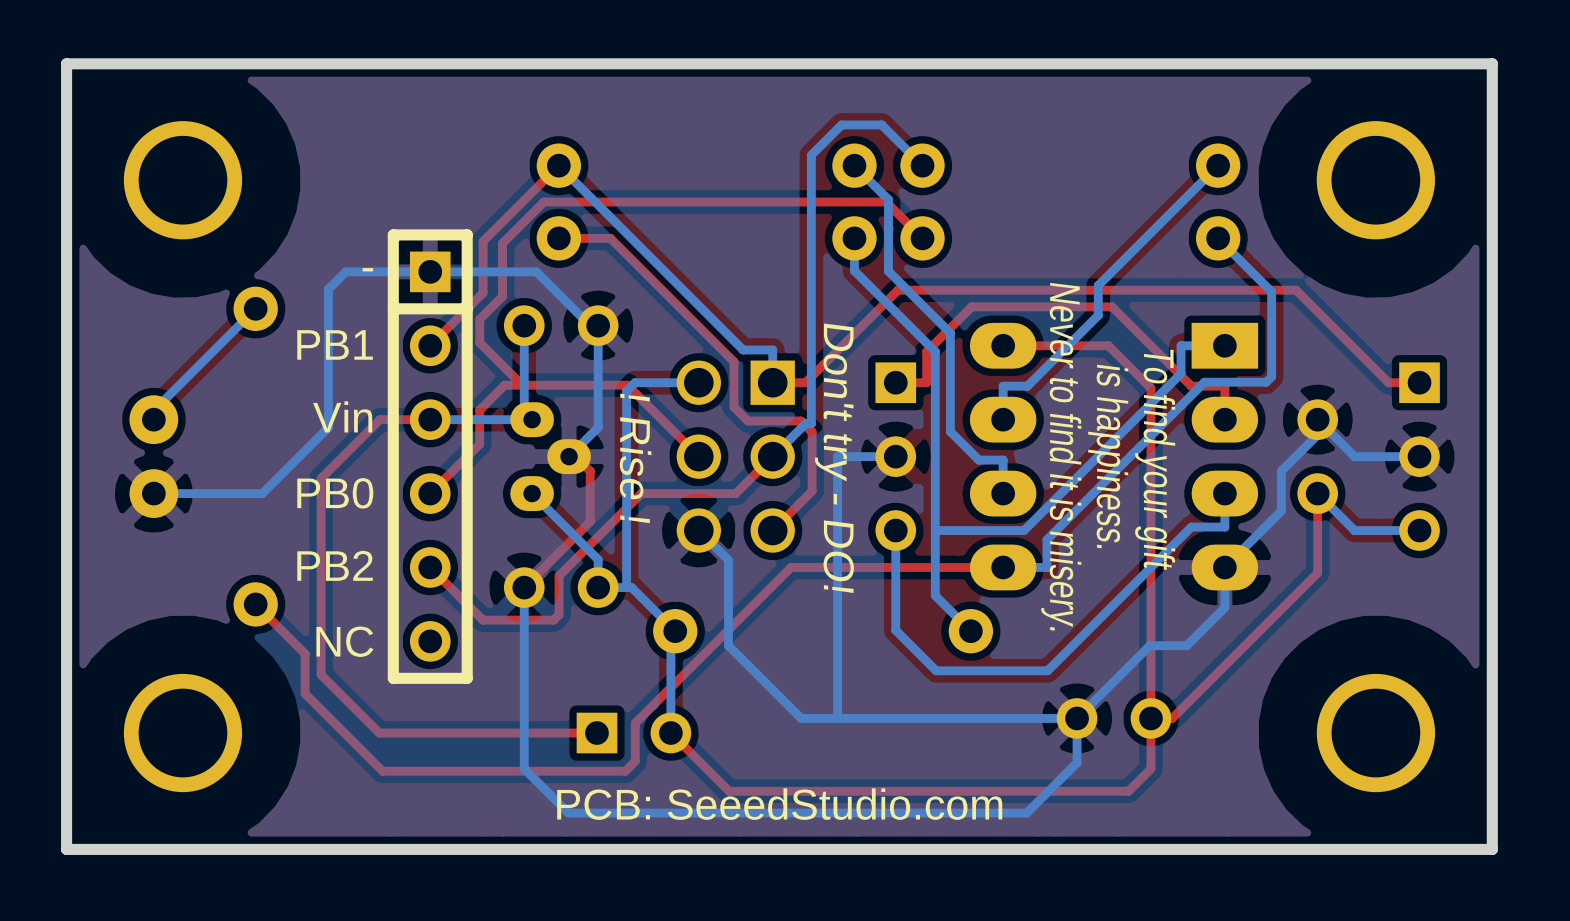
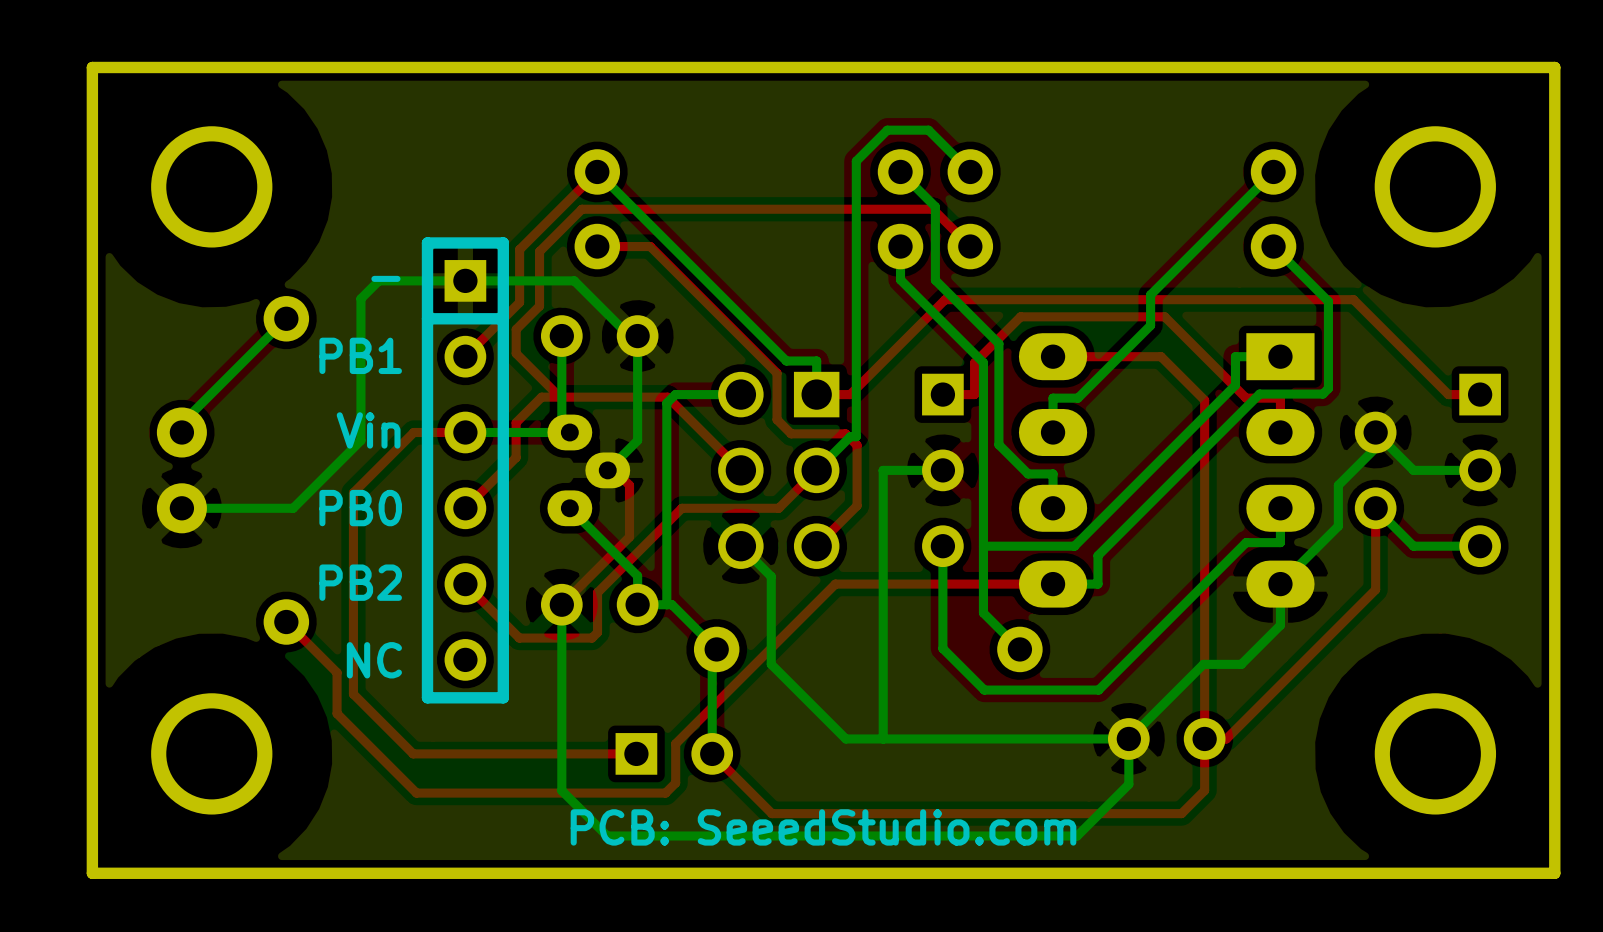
text: Never to find it is misery. (1061, 456) -> none
text: is happiness. (1108, 456) -> none
text: ! Rise ! (635, 458) -> none
text: Don't try - DO! (834, 458) -> none
text: To find your gift (1155, 459) -> none

